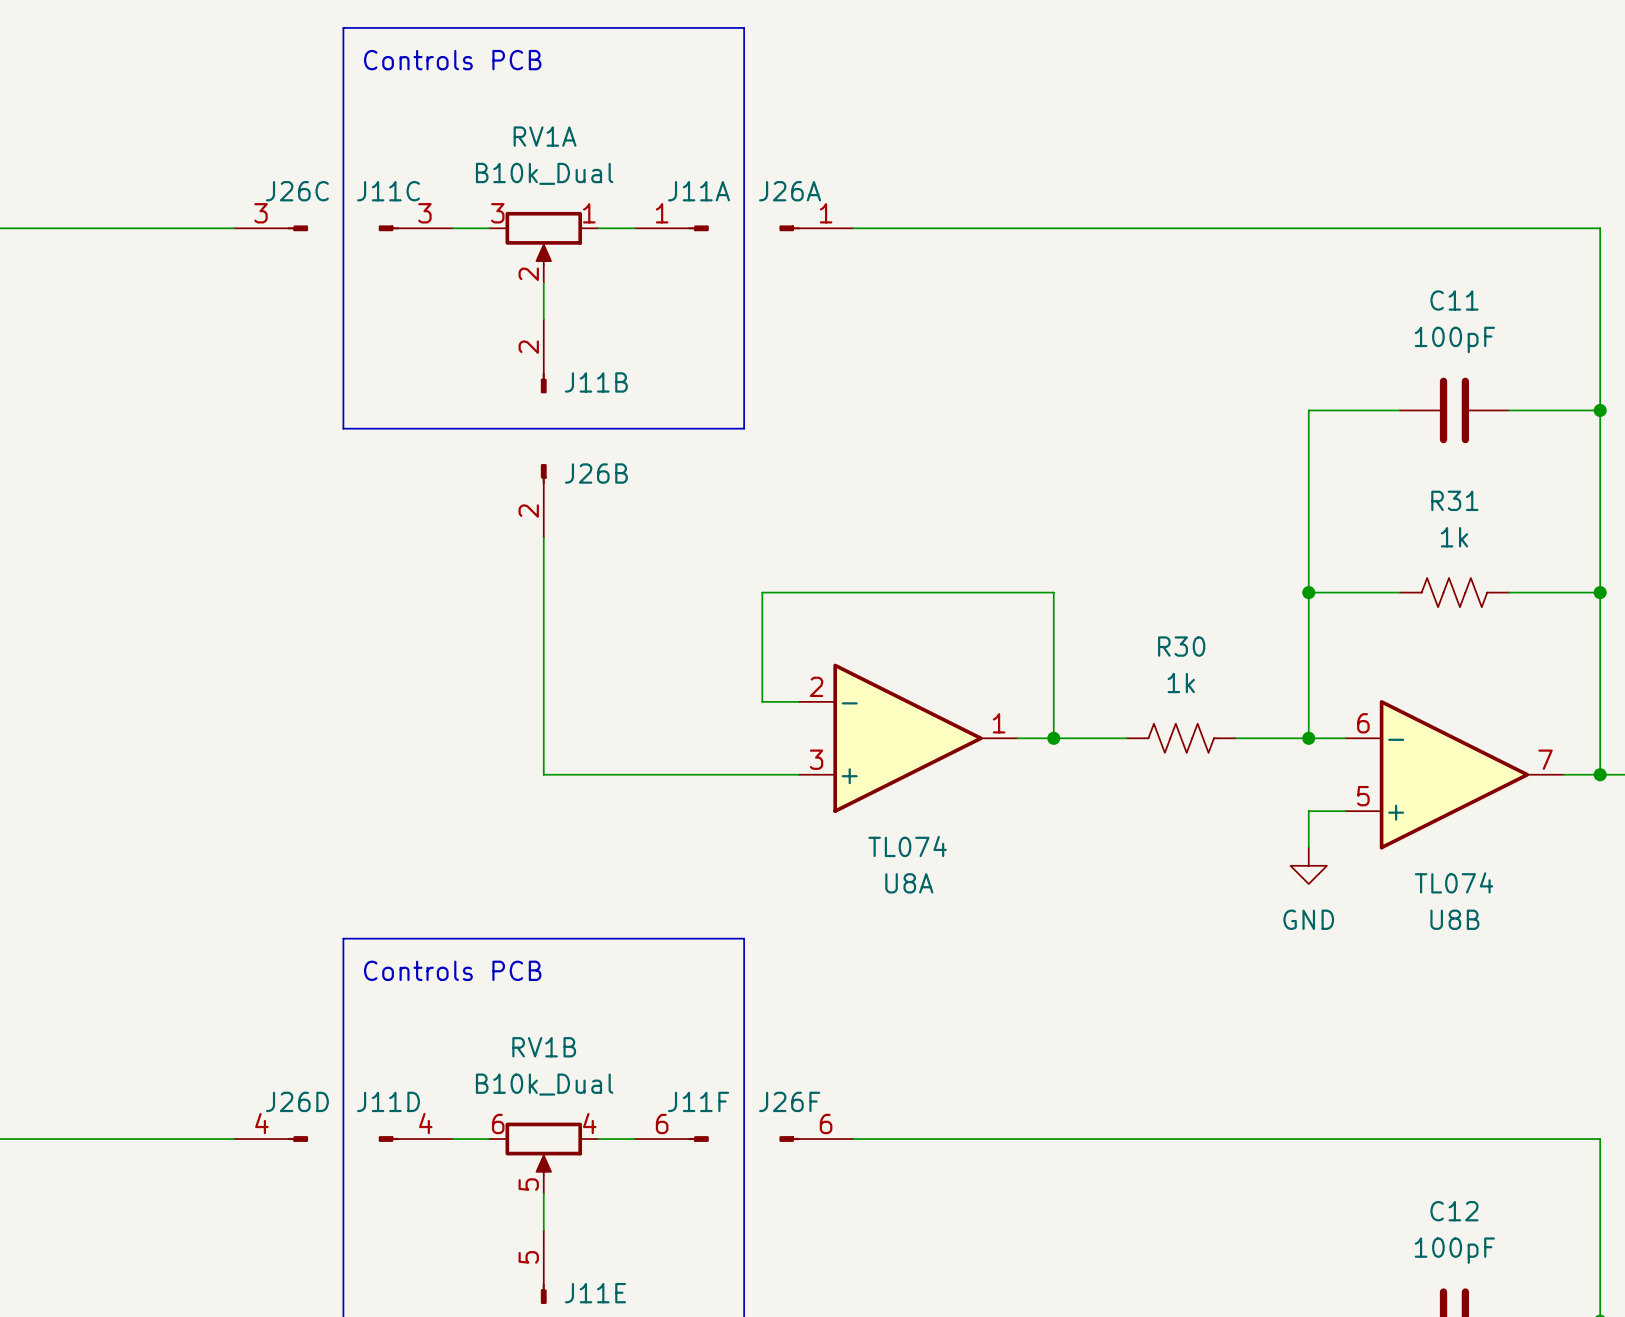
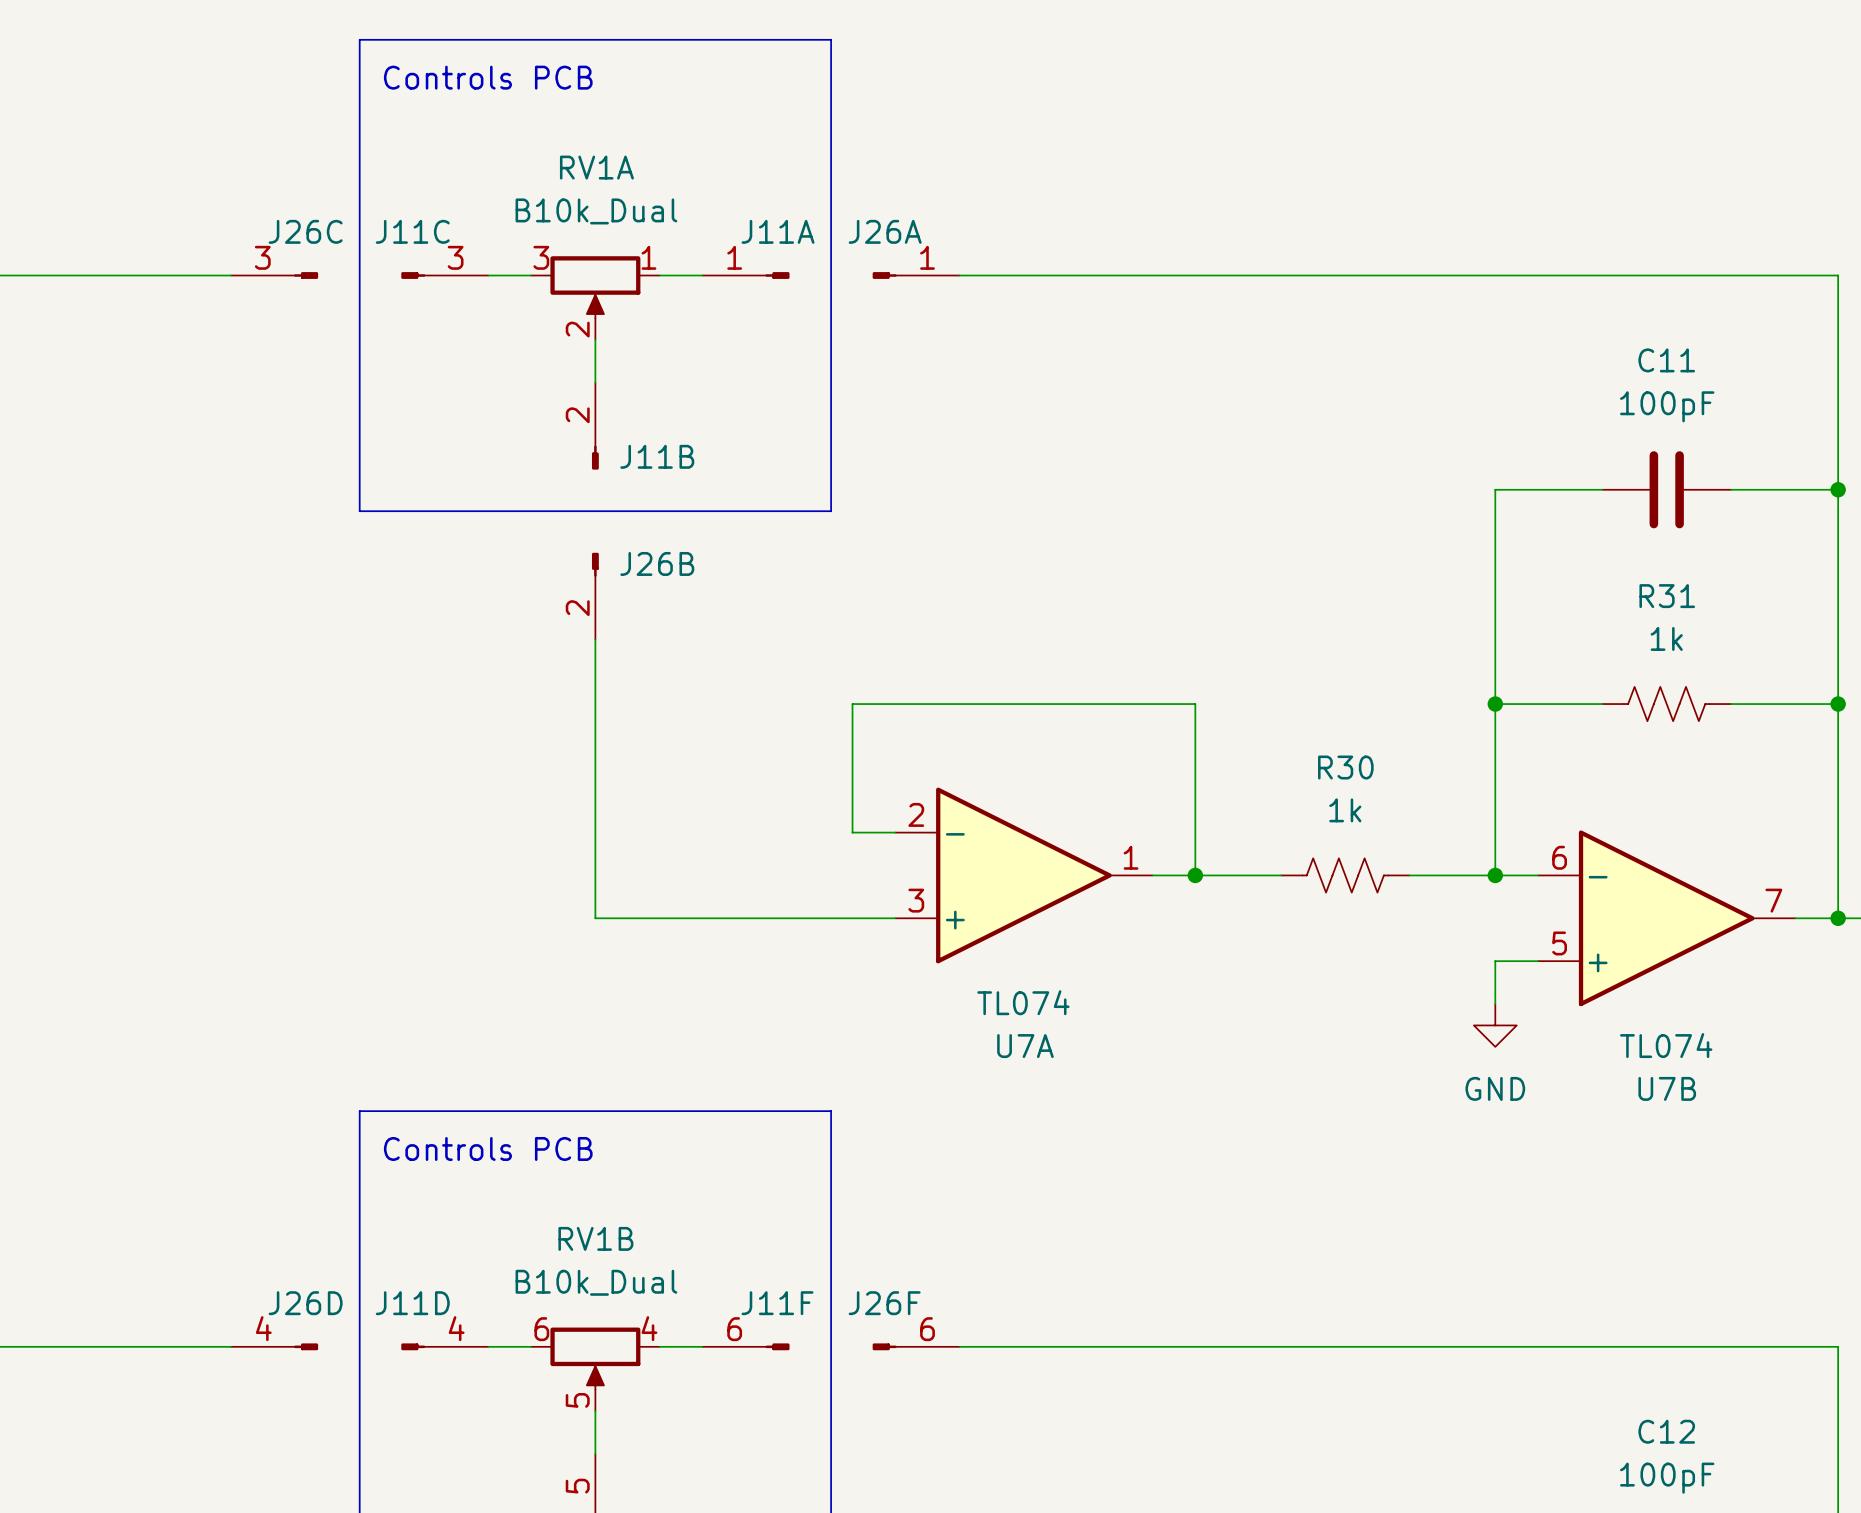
U8A name: U8A (909, 883) -> U7A (1025, 1046)
U8B name: U8B (1454, 919) -> U7B (1667, 1088)

